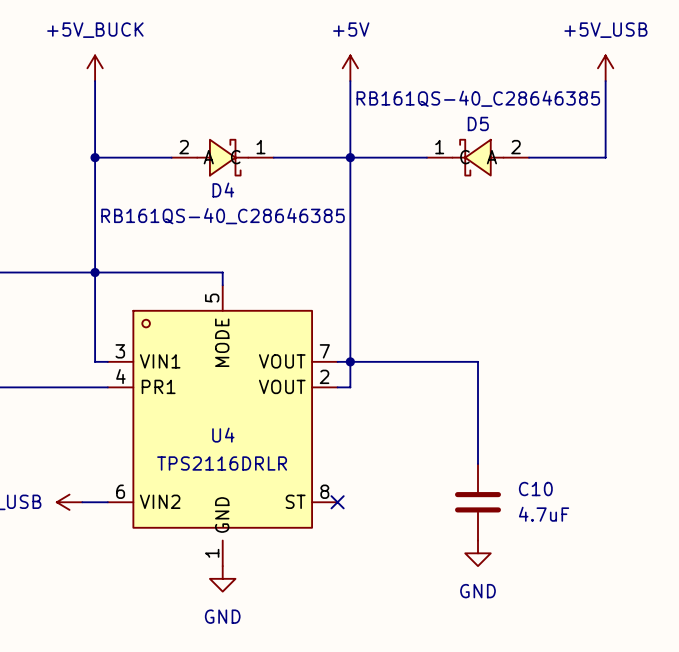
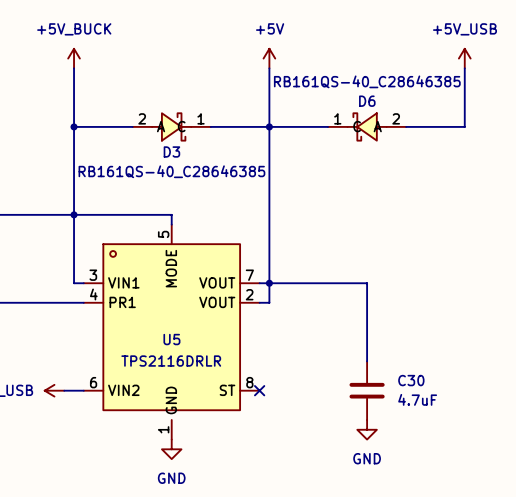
D5 name: D5 (478, 123) -> D6 (367, 101)
D4 name: D4 (223, 190) -> D3 (171, 151)
U4 name: U4 (223, 435) -> U5 (171, 339)
C10 name: C10 (535, 489) -> C30 (411, 380)

